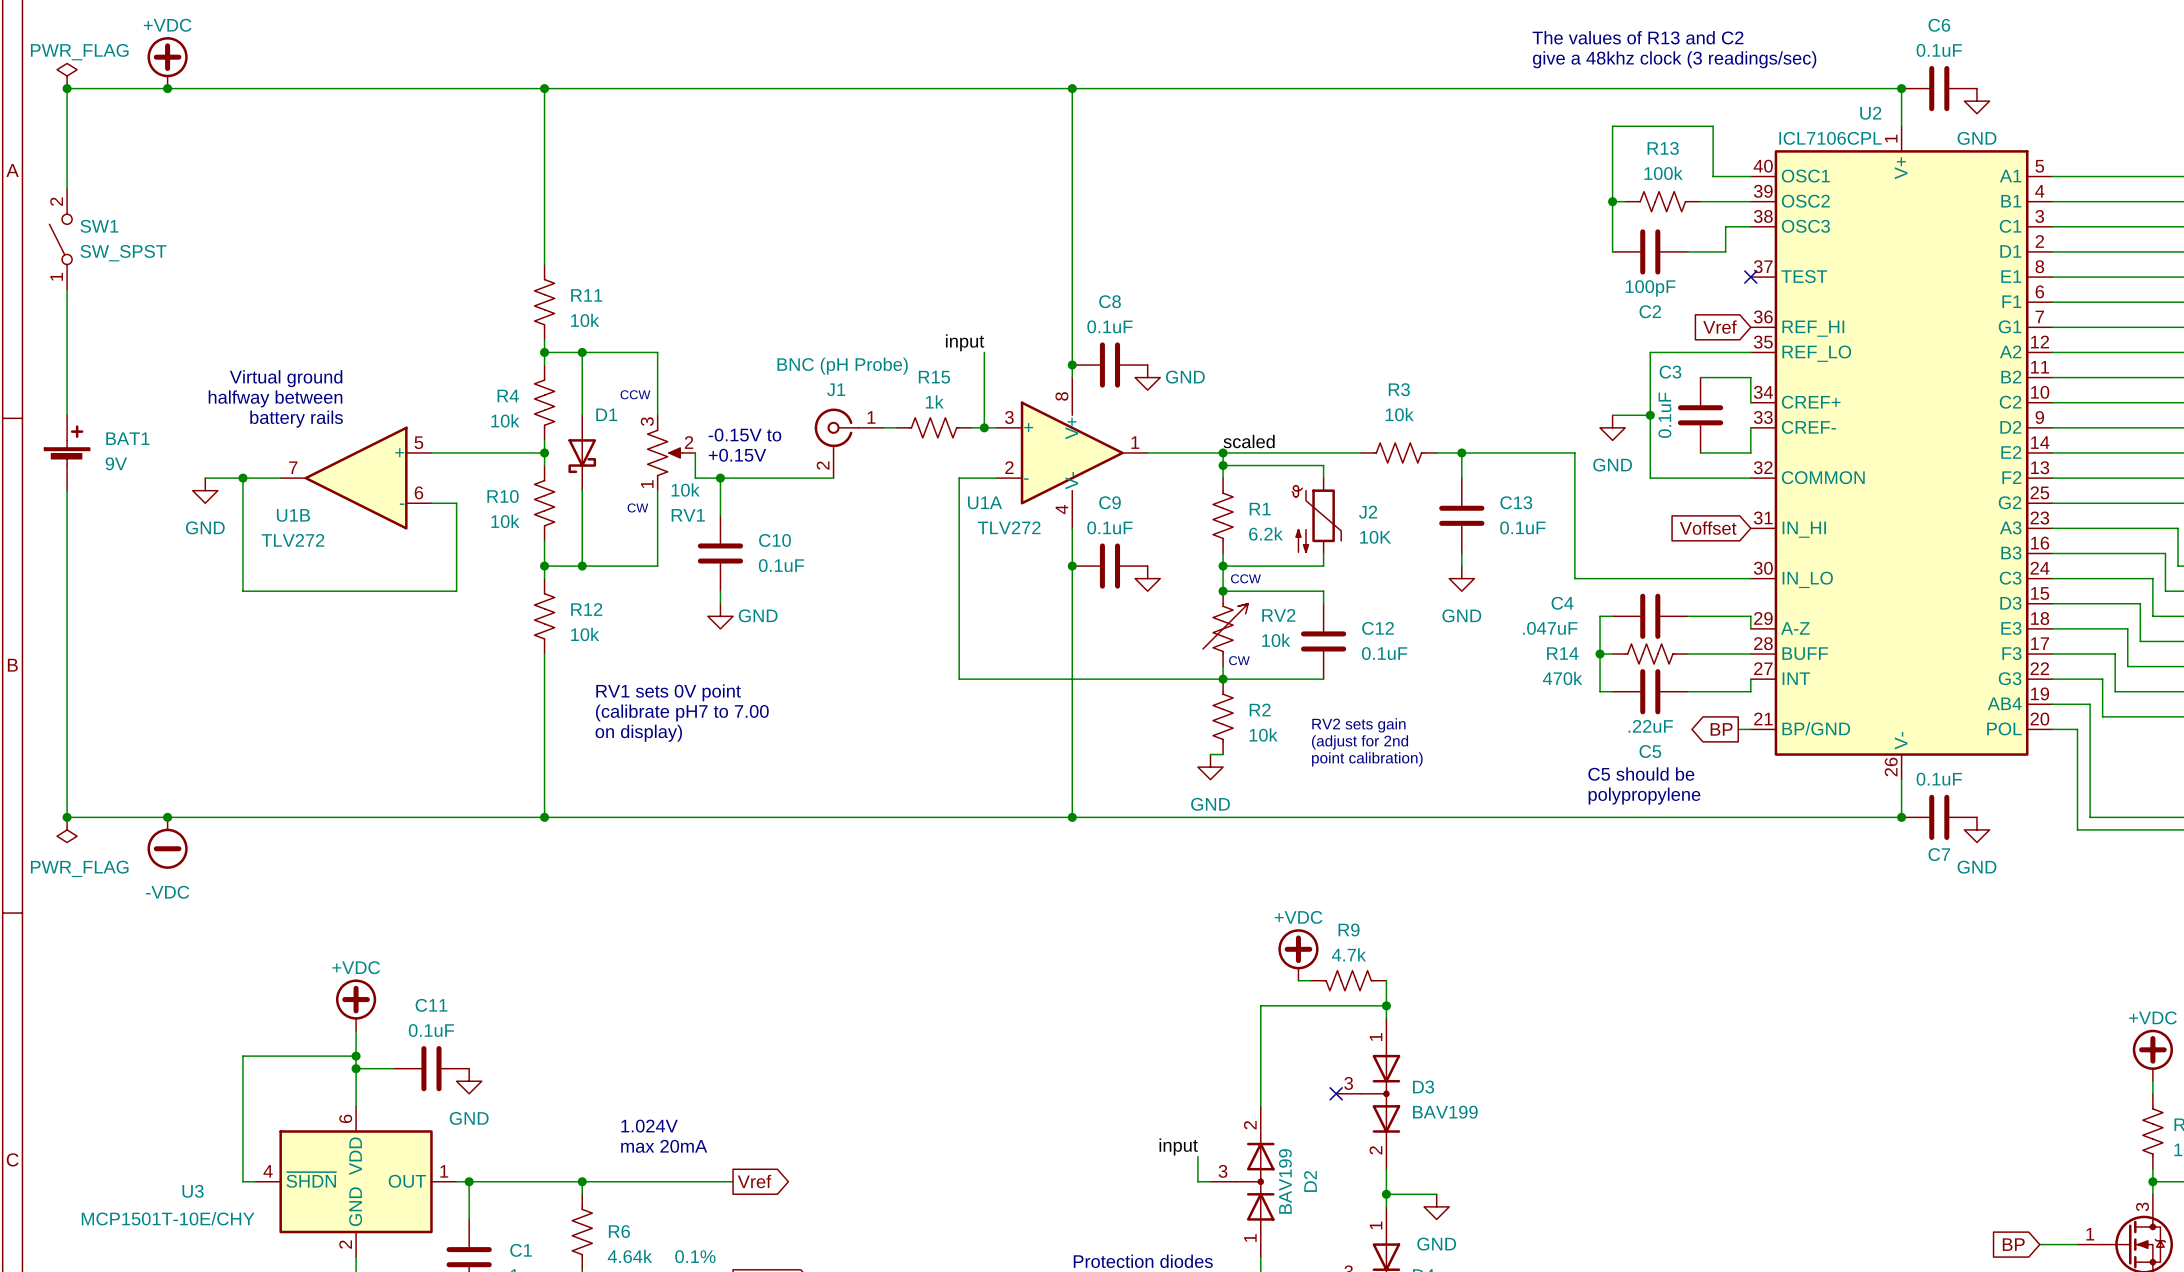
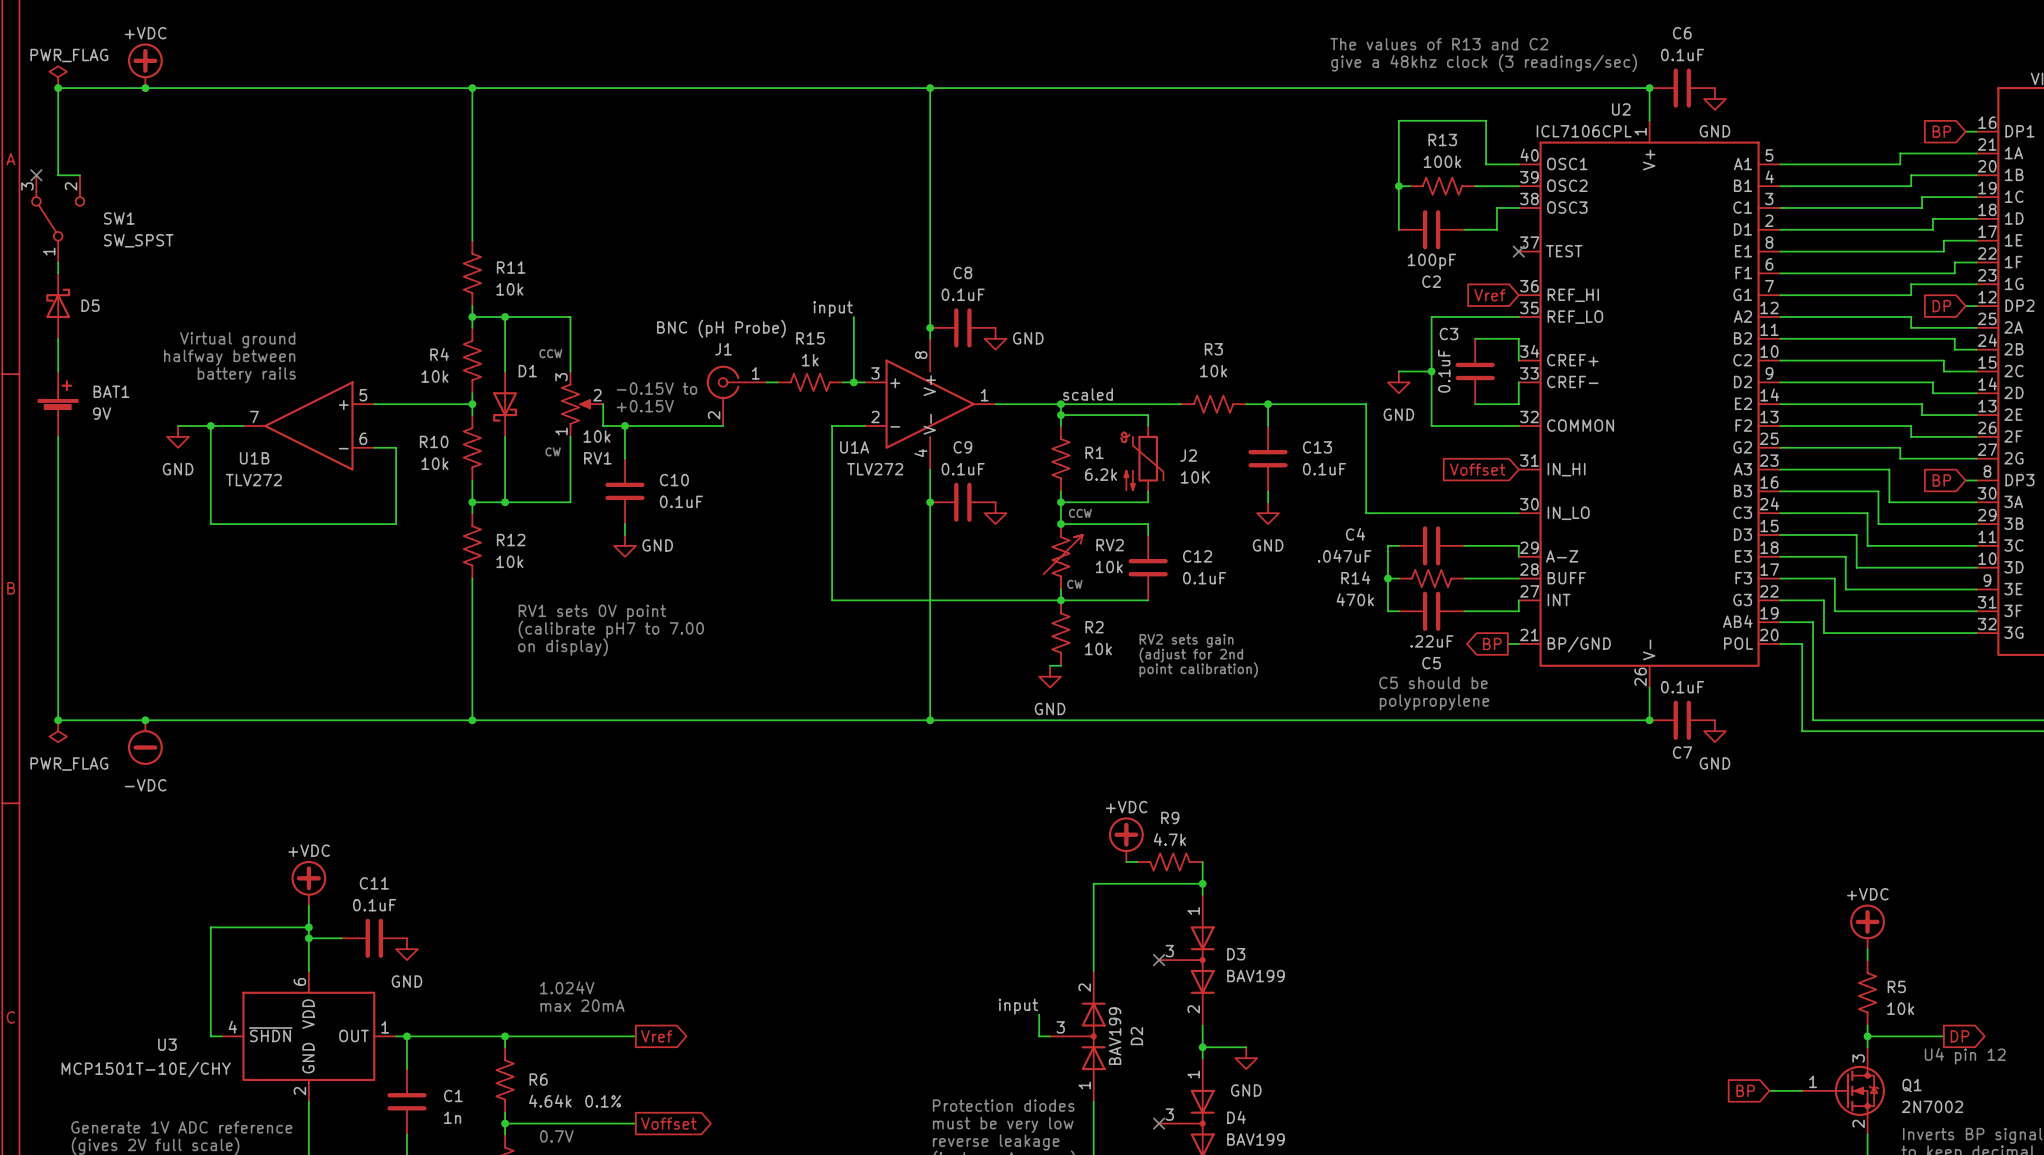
no-connect mark: none -> (36, 175)
SW1 symbol: [49, 189, 73, 290] -> [32, 175, 85, 263]
wire: none -> (58, 175) (79, 175)
SW1 name position: SW1 (99, 226) -> SW1 (119, 218)
SW1 value position: SW_SPST (123, 253) -> SW_SPST (138, 240)
D5: none -> (58, 306)

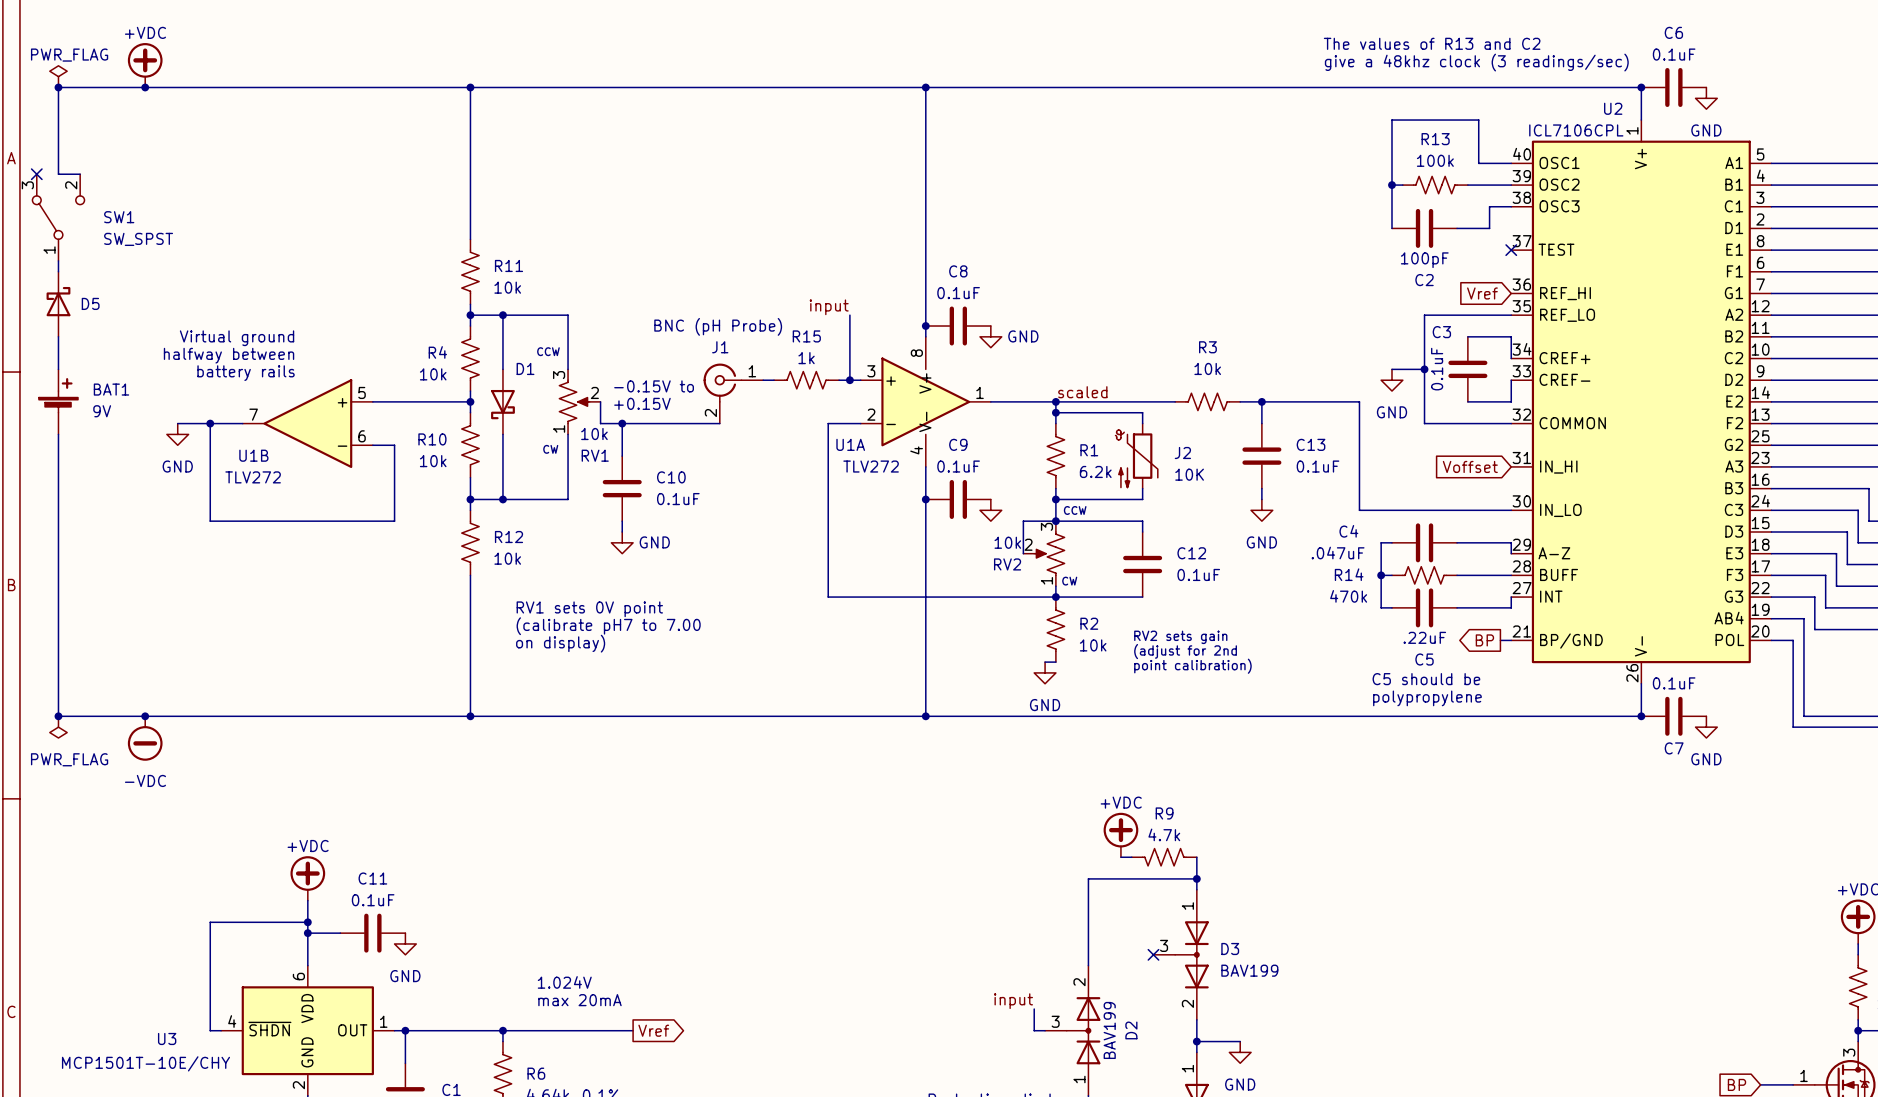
RV2 symbol: [1042, 524, 1084, 590] -> [1023, 521, 1065, 587]
wire: none -> (1055, 521) (1023, 521) (1023, 553)
RV2 name position: RV2 (1110, 545) -> RV2 (1007, 564)
RV2 value position: 10k (1109, 566) -> 10k (1007, 542)

